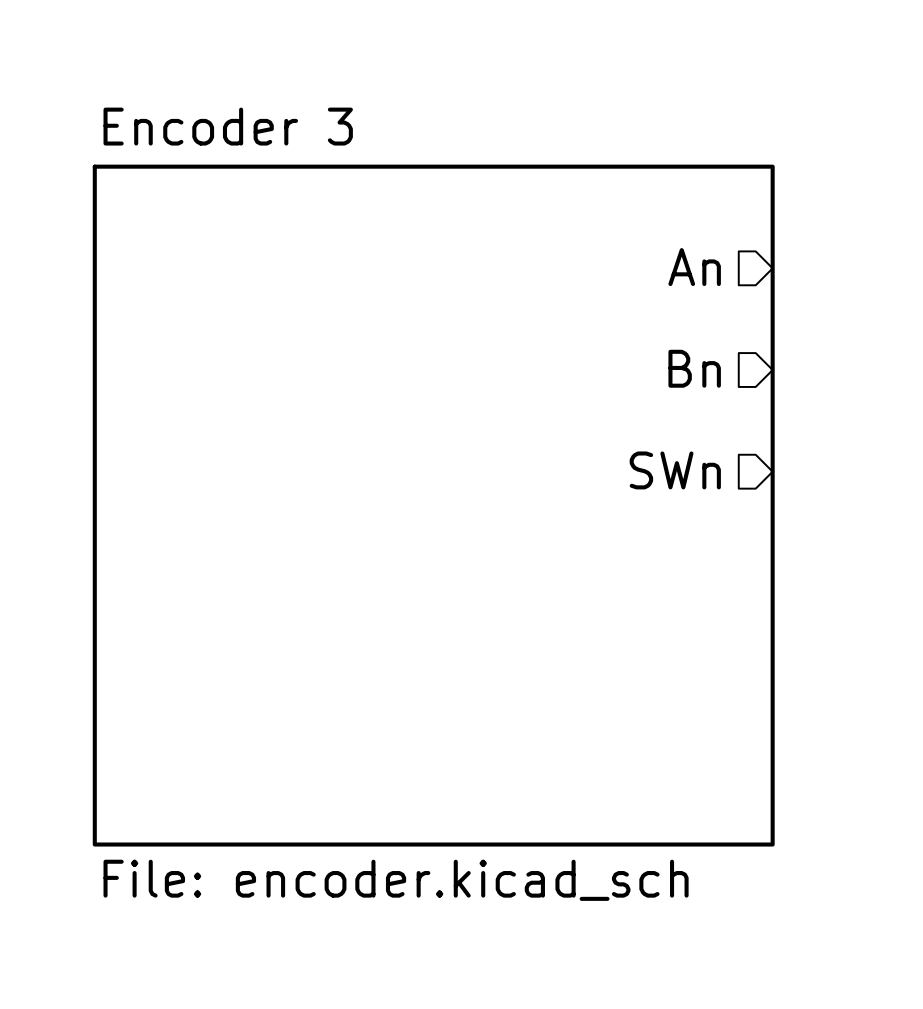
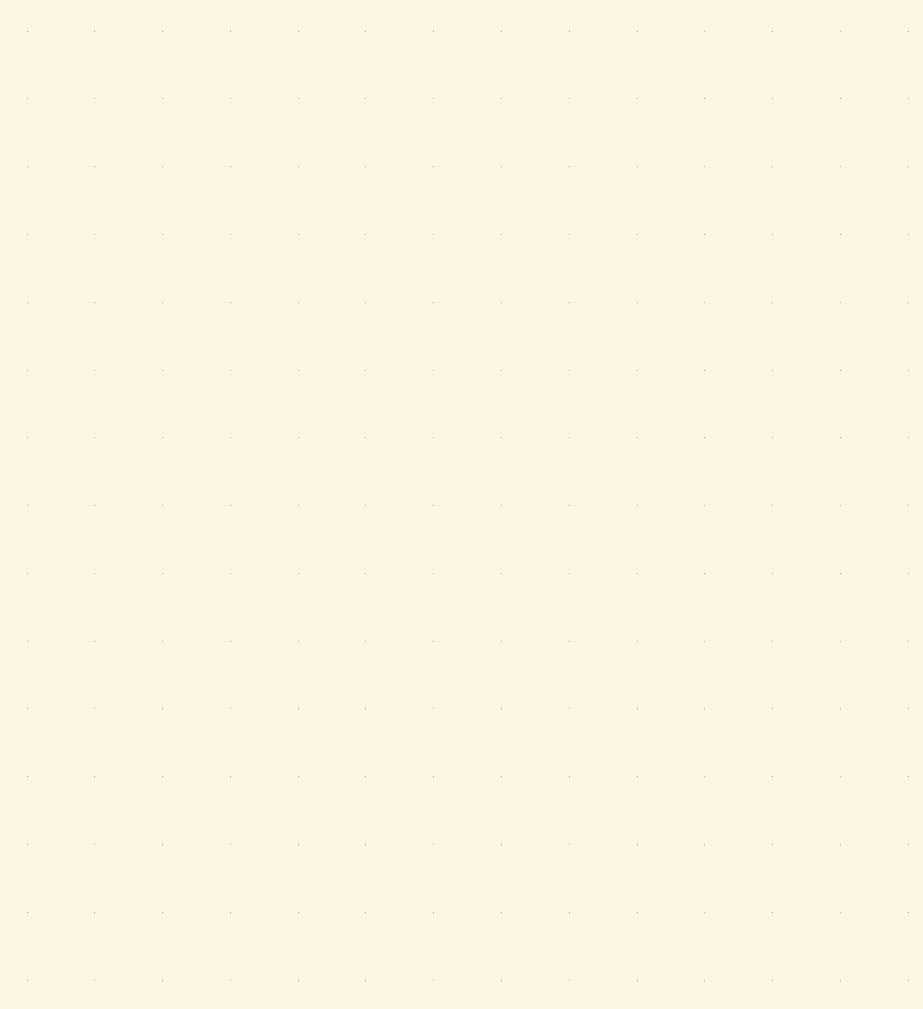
sheet pin: An (694, 267) -> none
sheet pin: Bn (694, 368) -> none
sheet pin: SWn (675, 470) -> none
sheet Encoder 3: File: encoder.kicad_sch (433, 505) -> none

